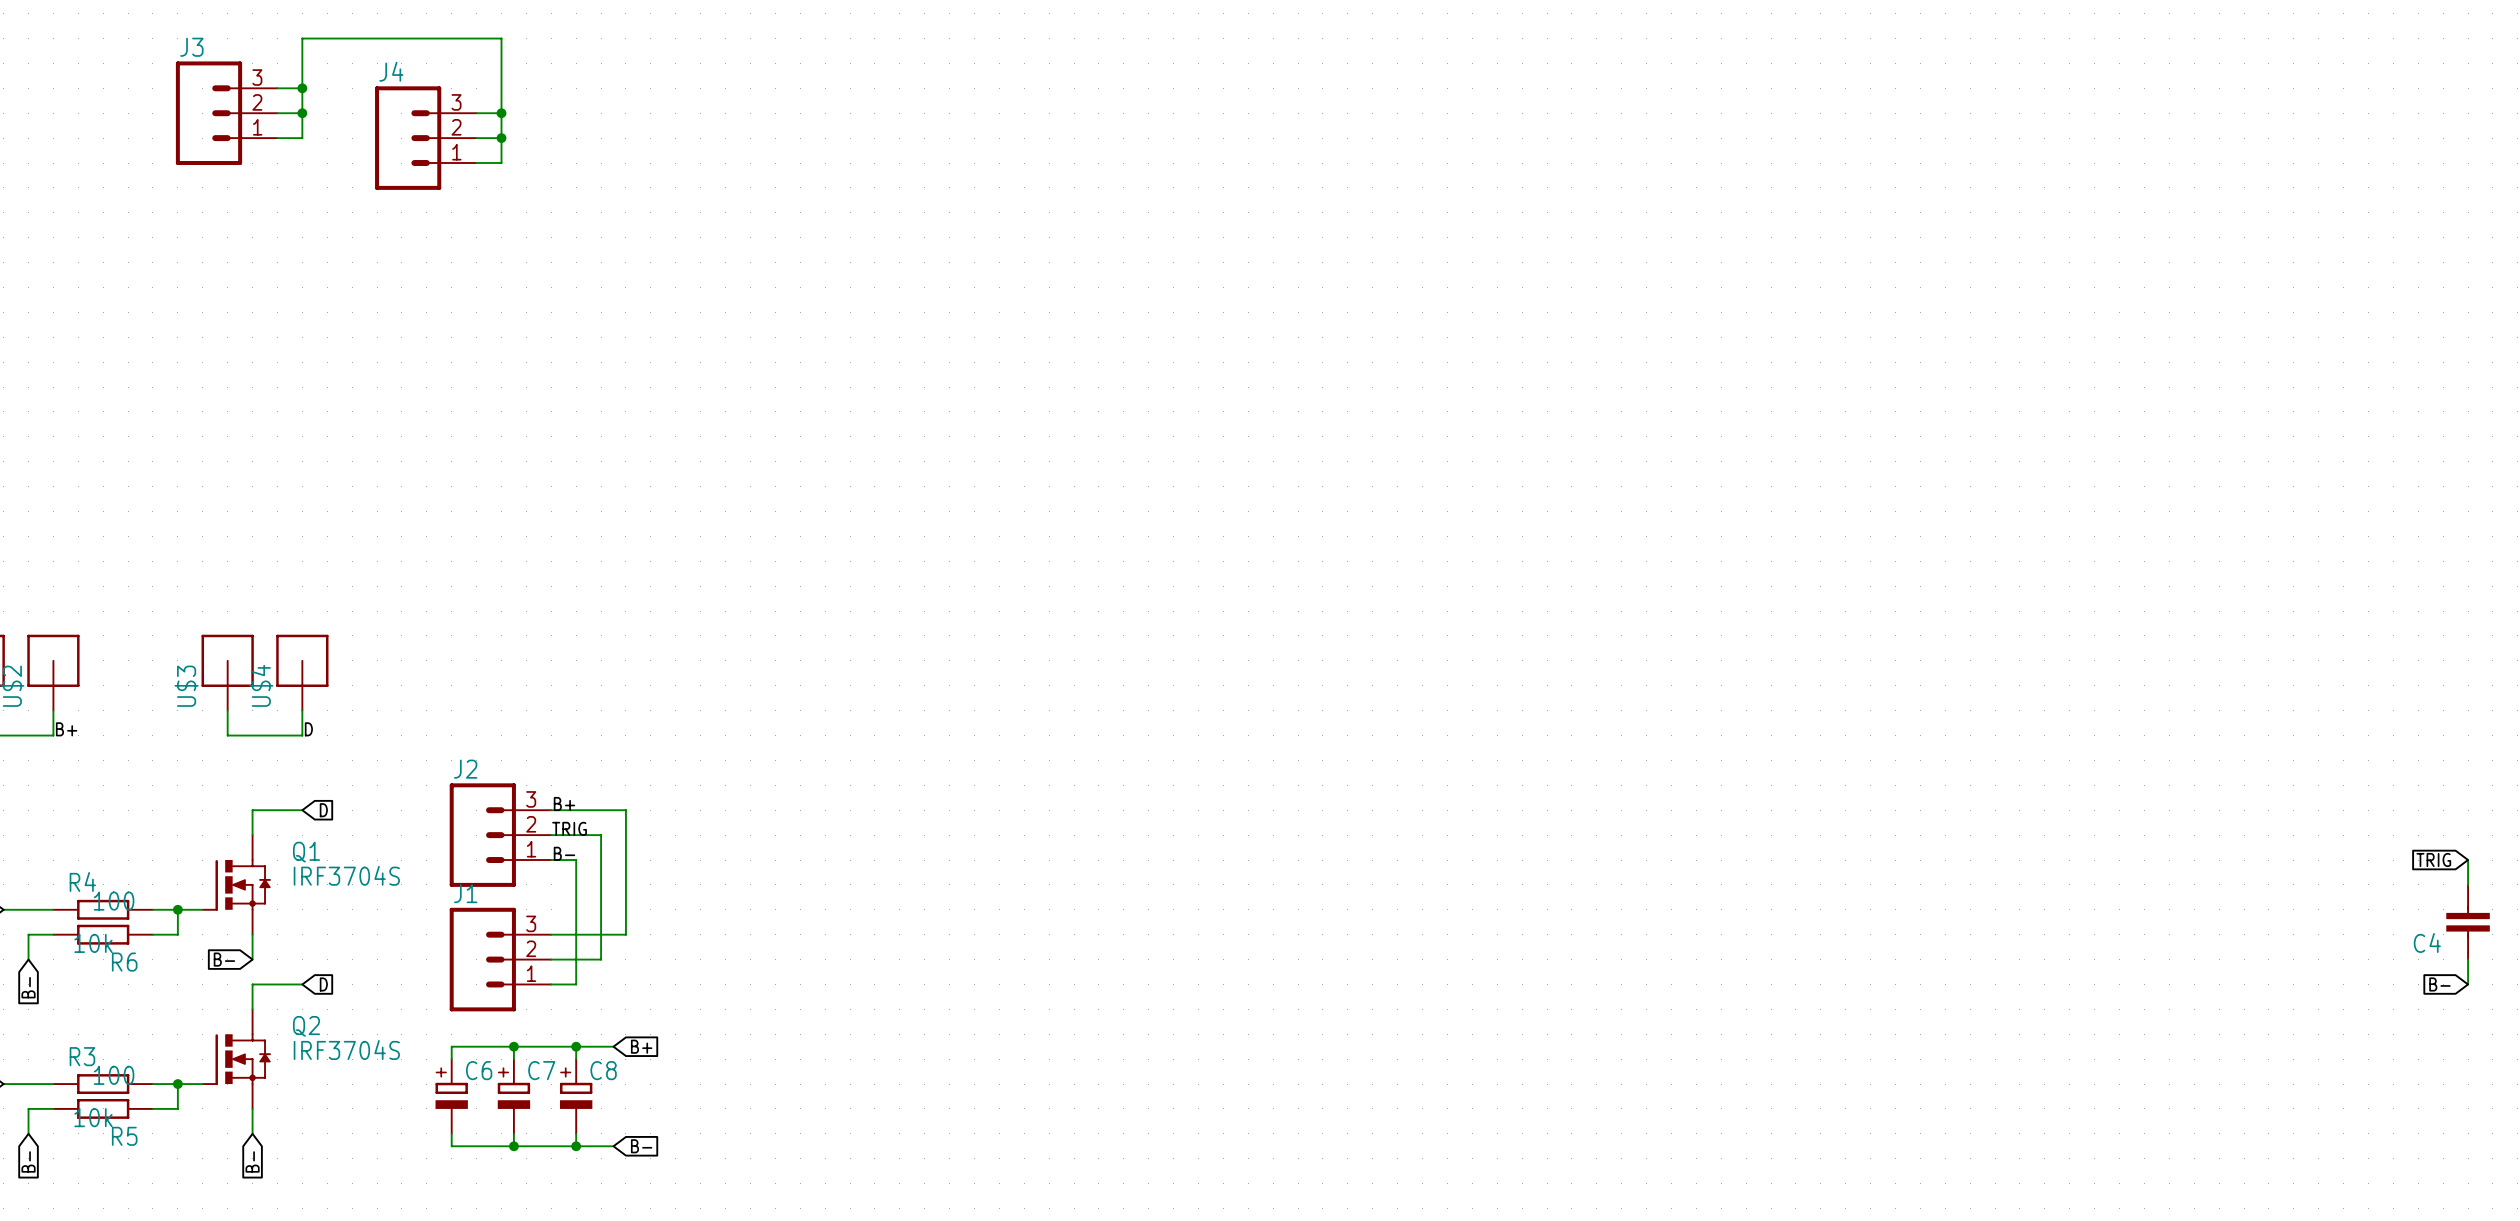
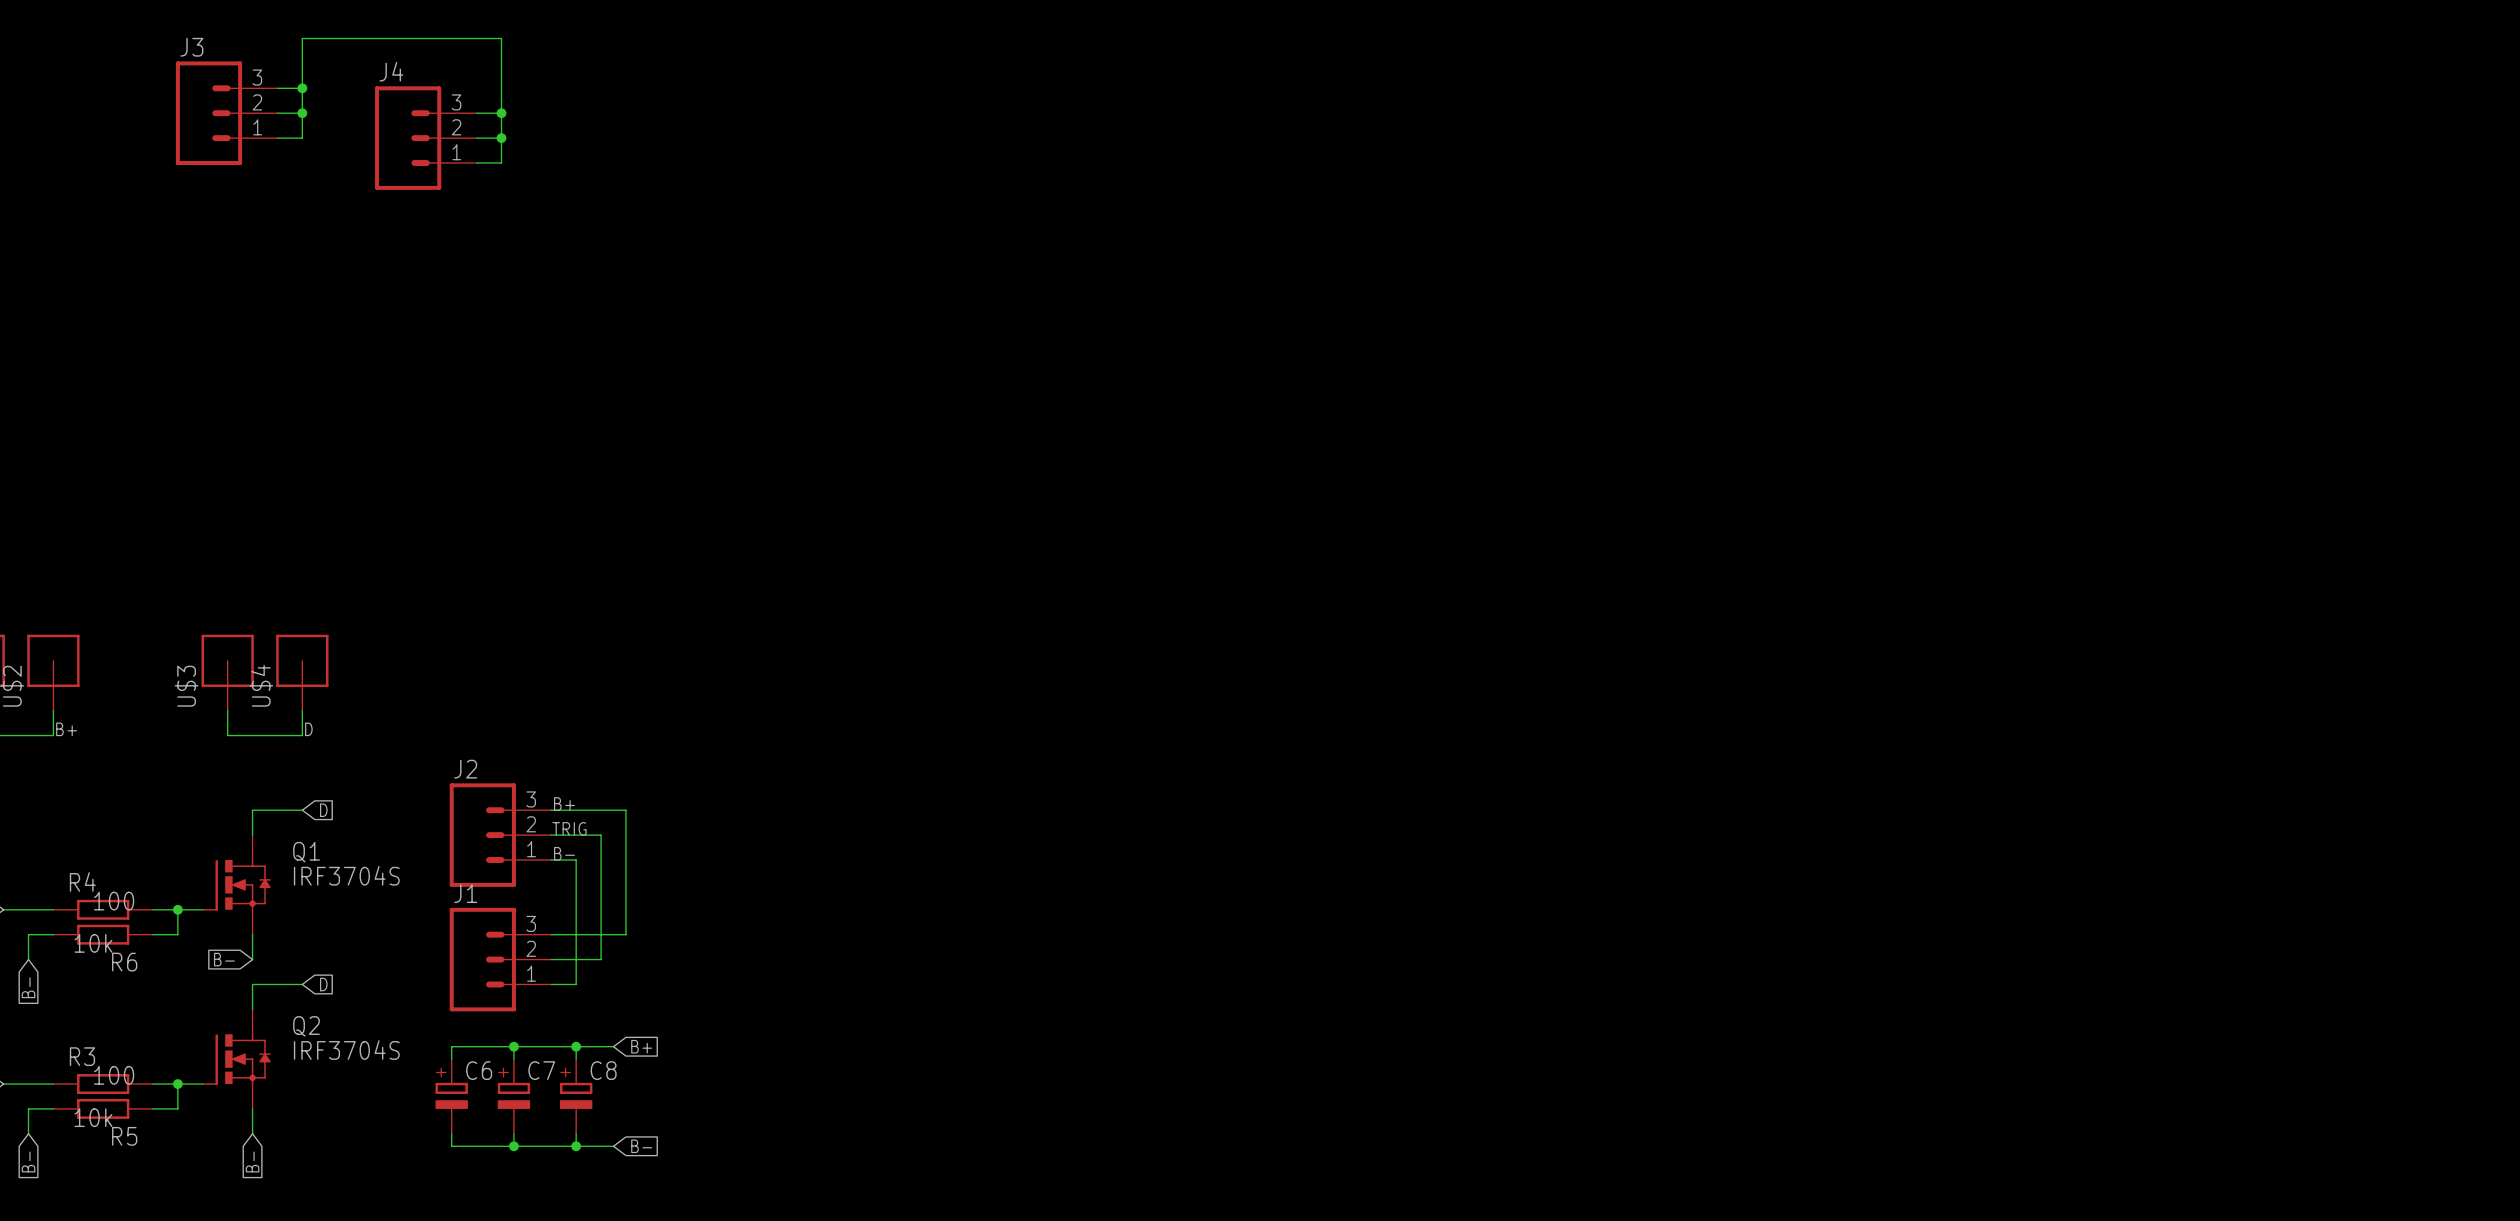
global label: TRIG (2433, 860) -> none
wire: (2468, 860) (2468, 884) -> none
C4: (2468, 922) -> none
wire: (2468, 959) (2468, 984) -> none
global label: B- (2439, 984) -> none

